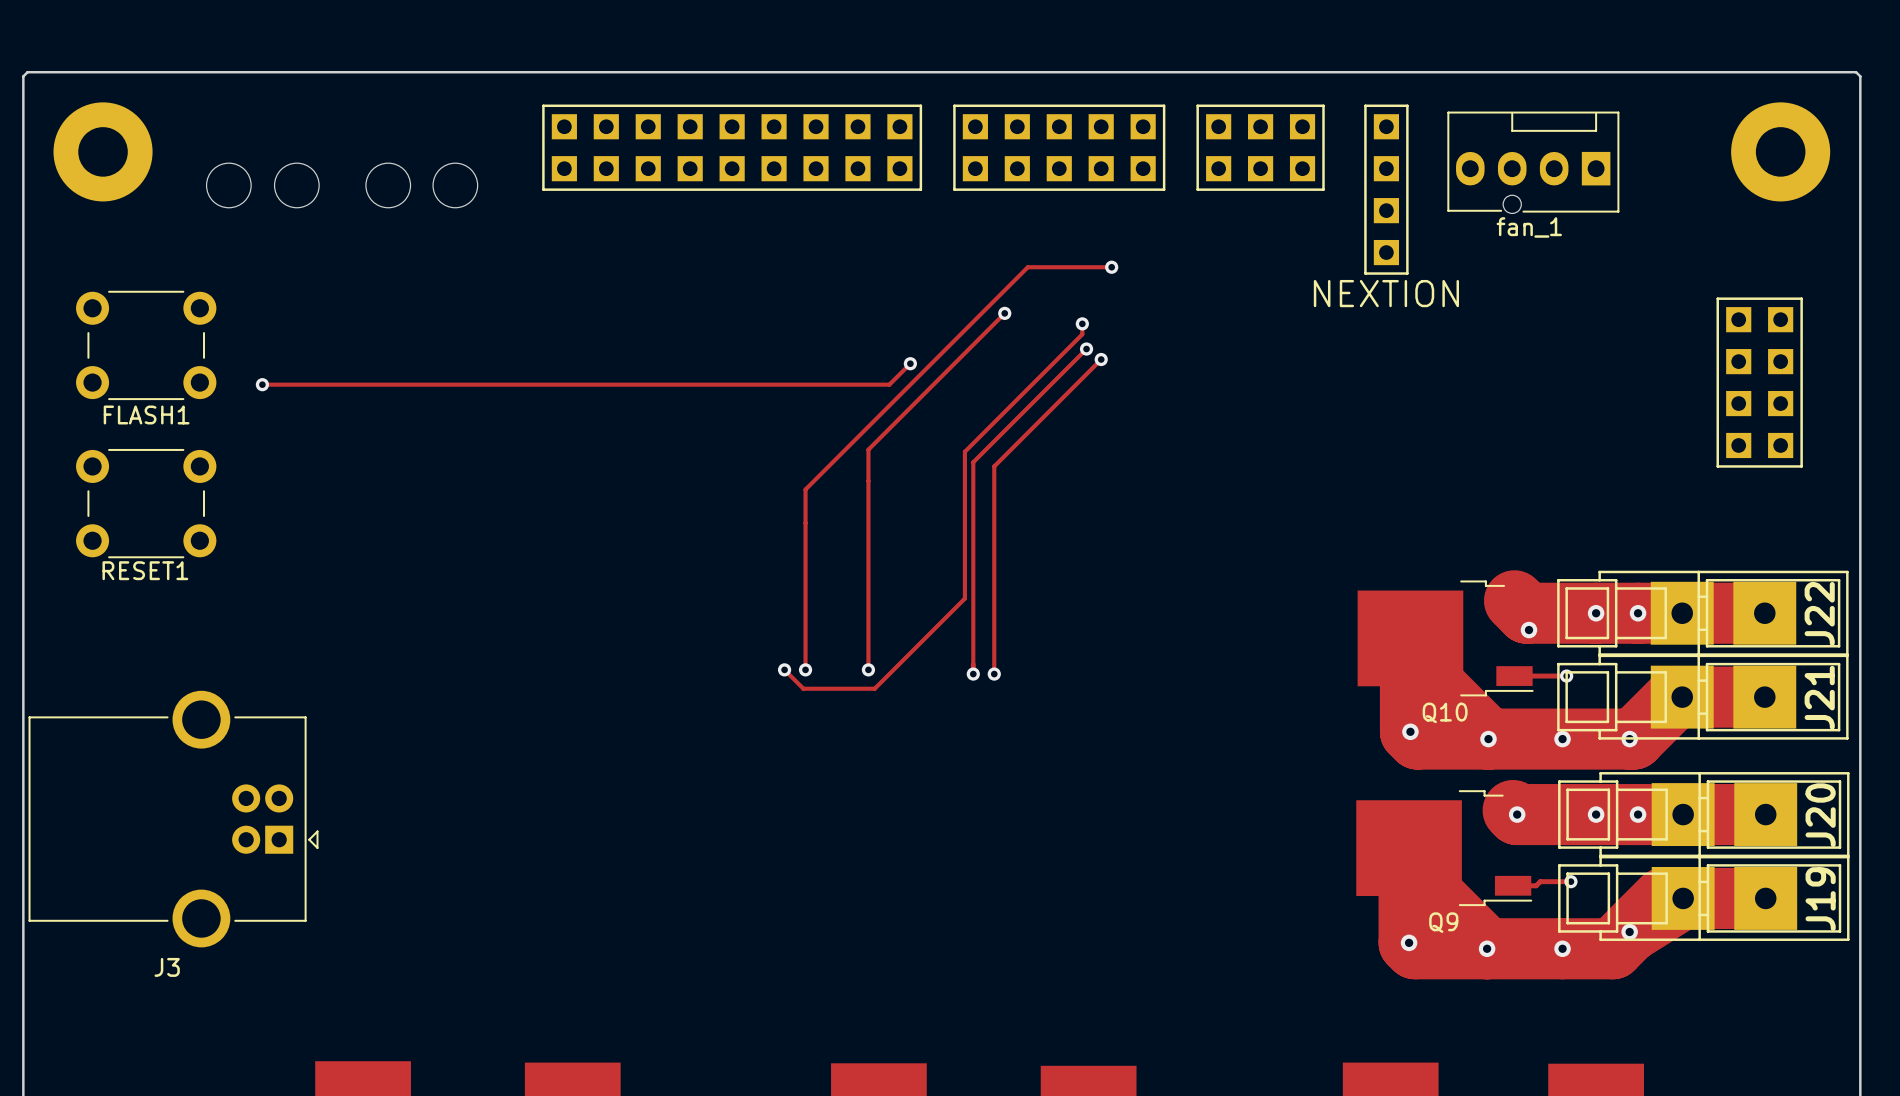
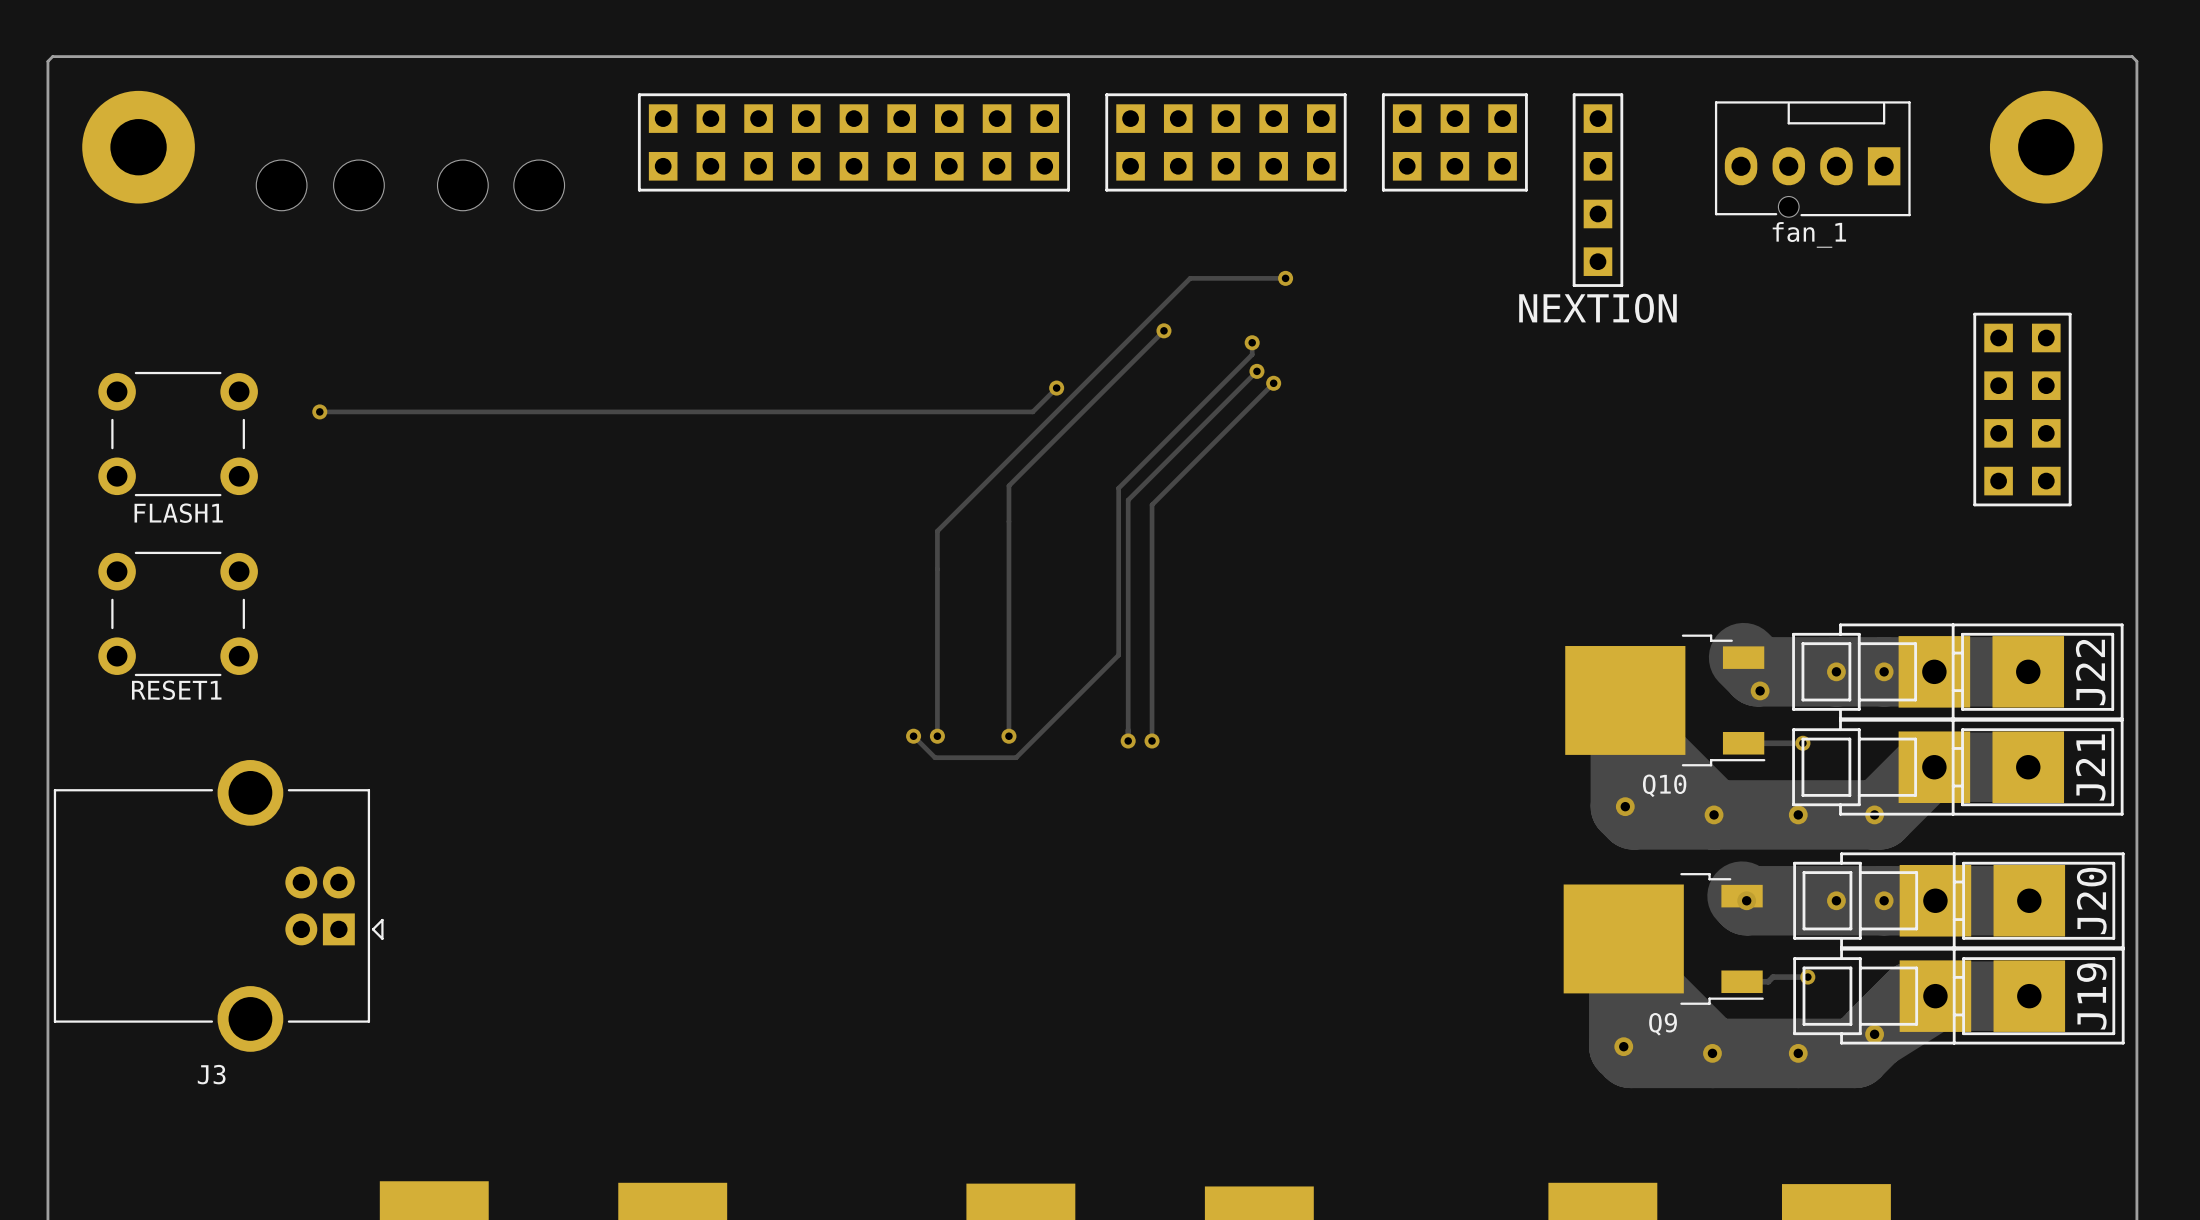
fan_1 position: (1533, 162) -> (1812, 159)
FLASH1 position: (146, 345) -> (178, 434)
RESET1 position: (146, 503) -> (178, 613)

